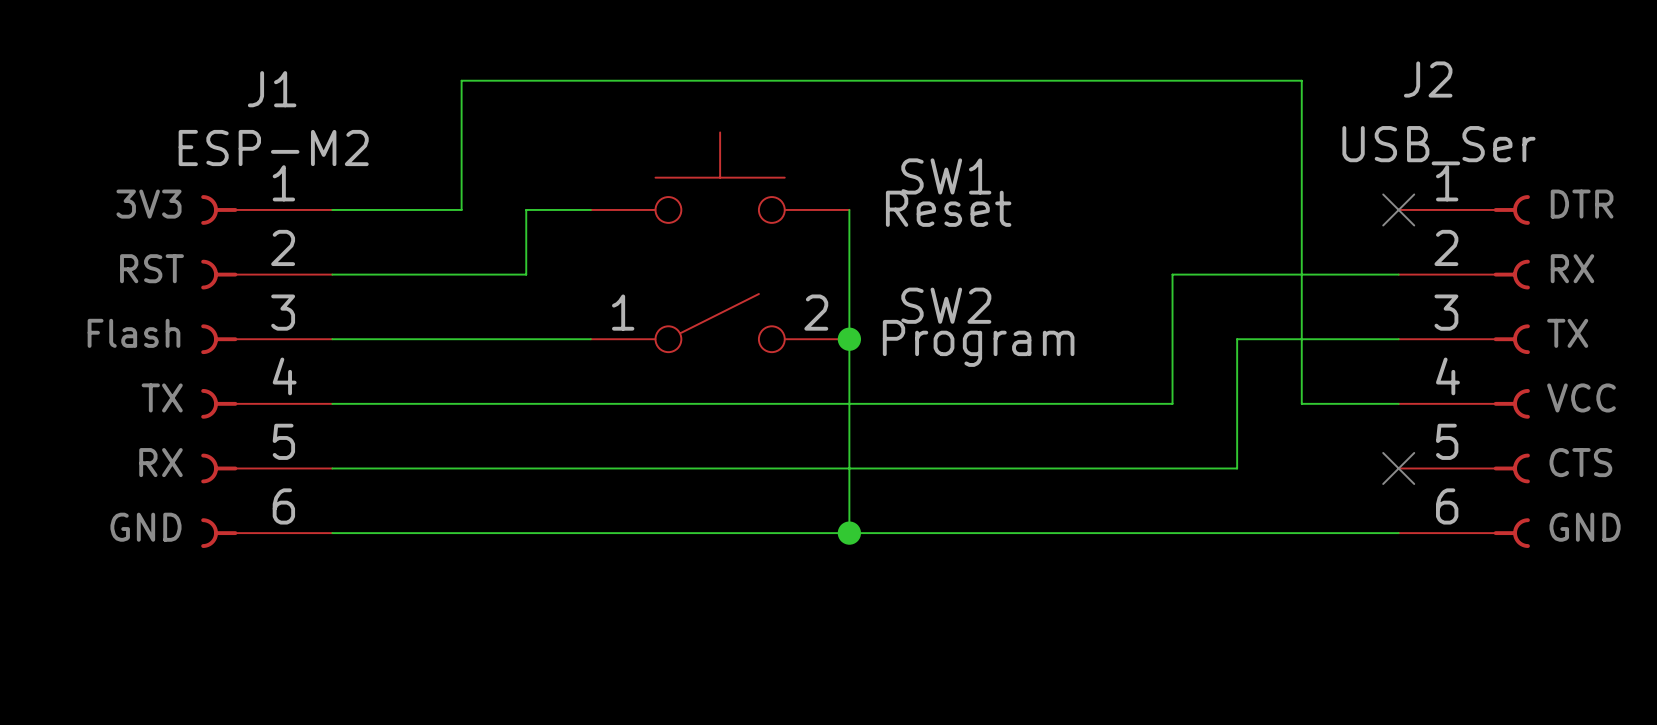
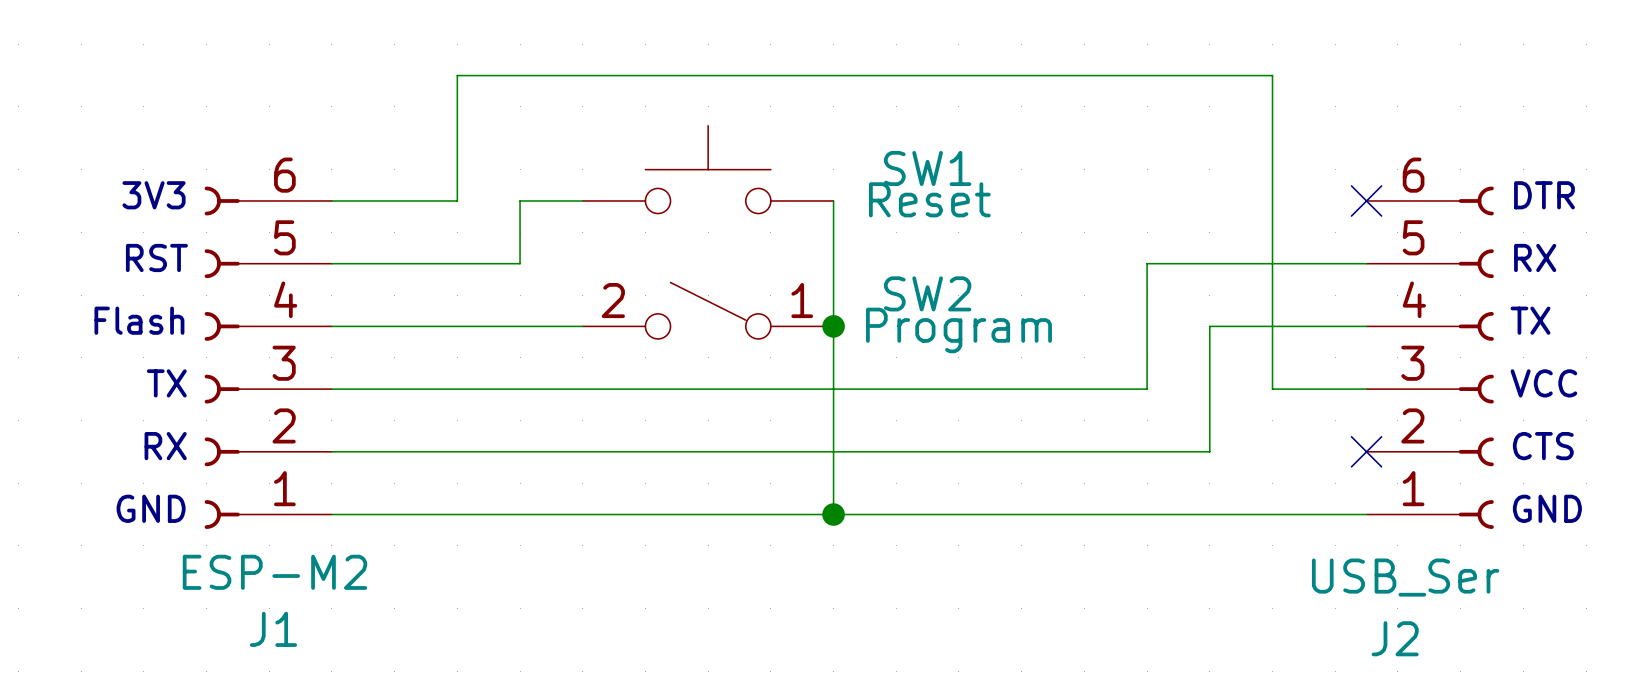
SW2 flip: as is (720, 323) -> left-right (708, 310)
J1 flip: as is (219, 371) -> up-down (222, 357)
J2 flip: as is (1511, 371) -> up-down (1476, 357)

